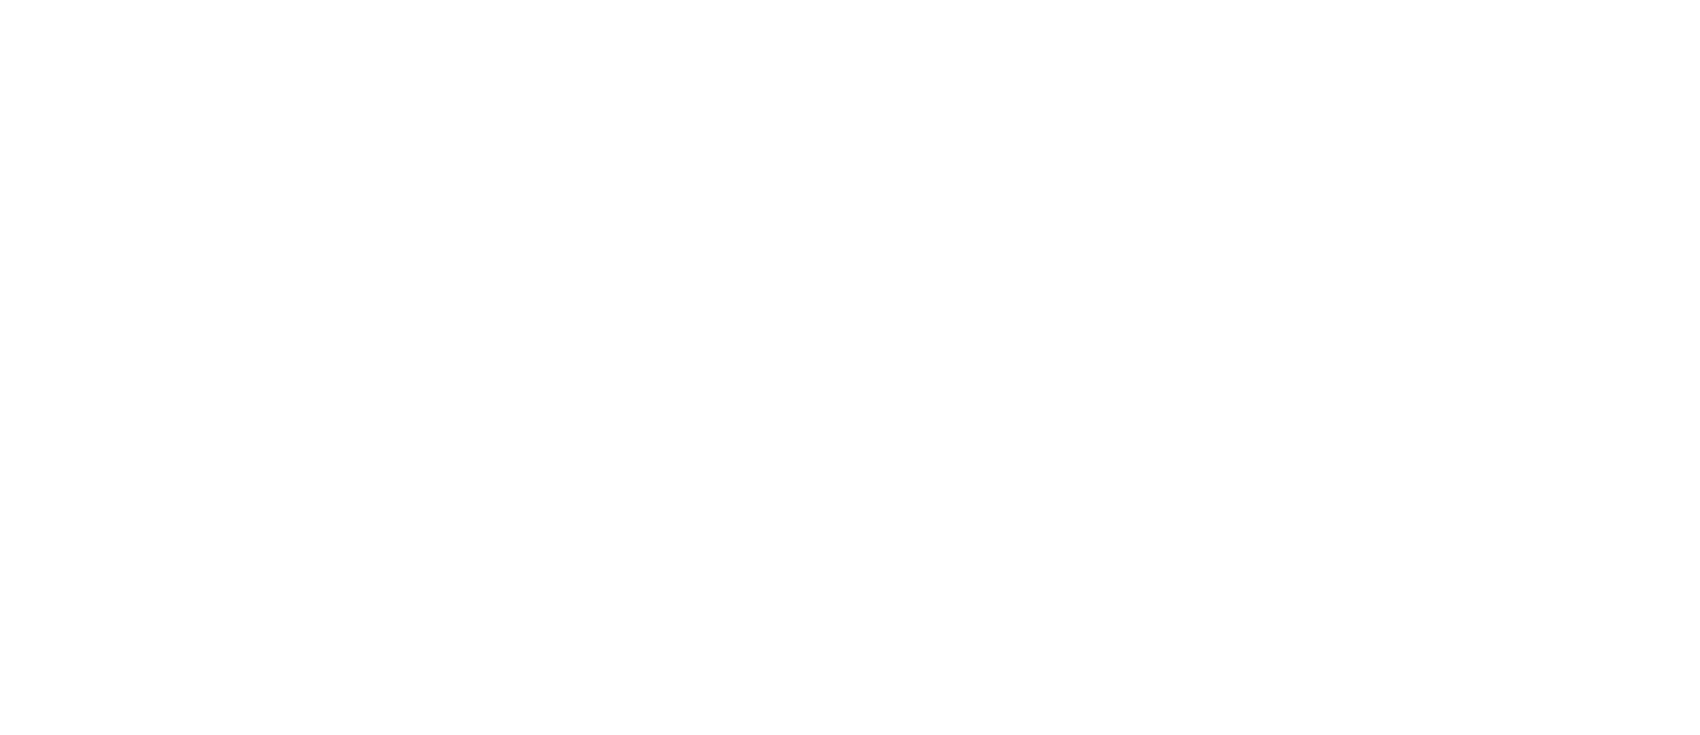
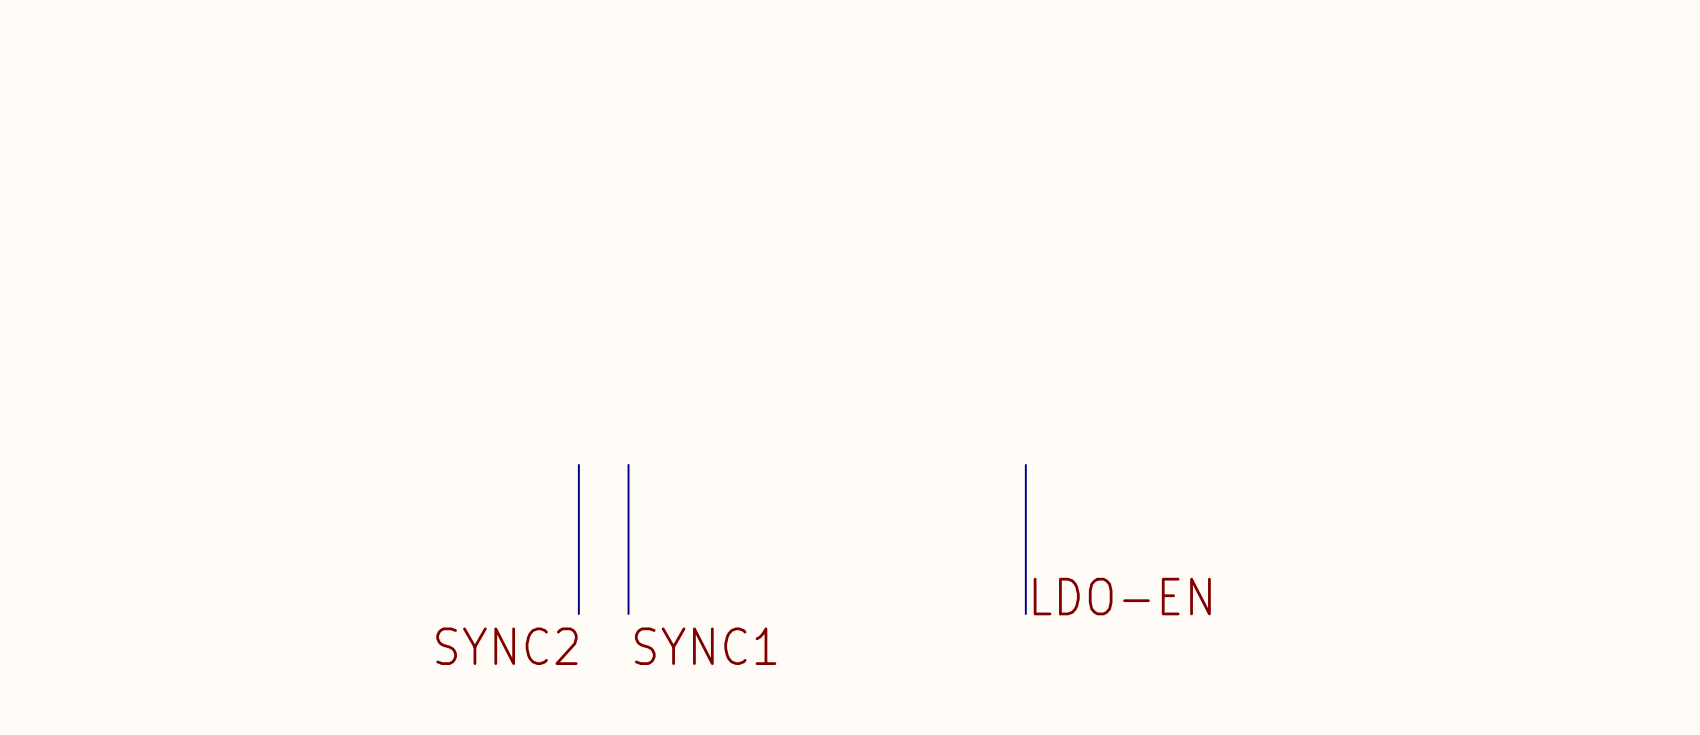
wire: none -> (578, 464) (578, 613)
wire: none -> (628, 464) (628, 613)
wire: none -> (1025, 464) (1025, 613)
label: none -> LDO-EN (1122, 596)
label: none -> SYNC2 (506, 646)
label: none -> SYNC1 (705, 646)

